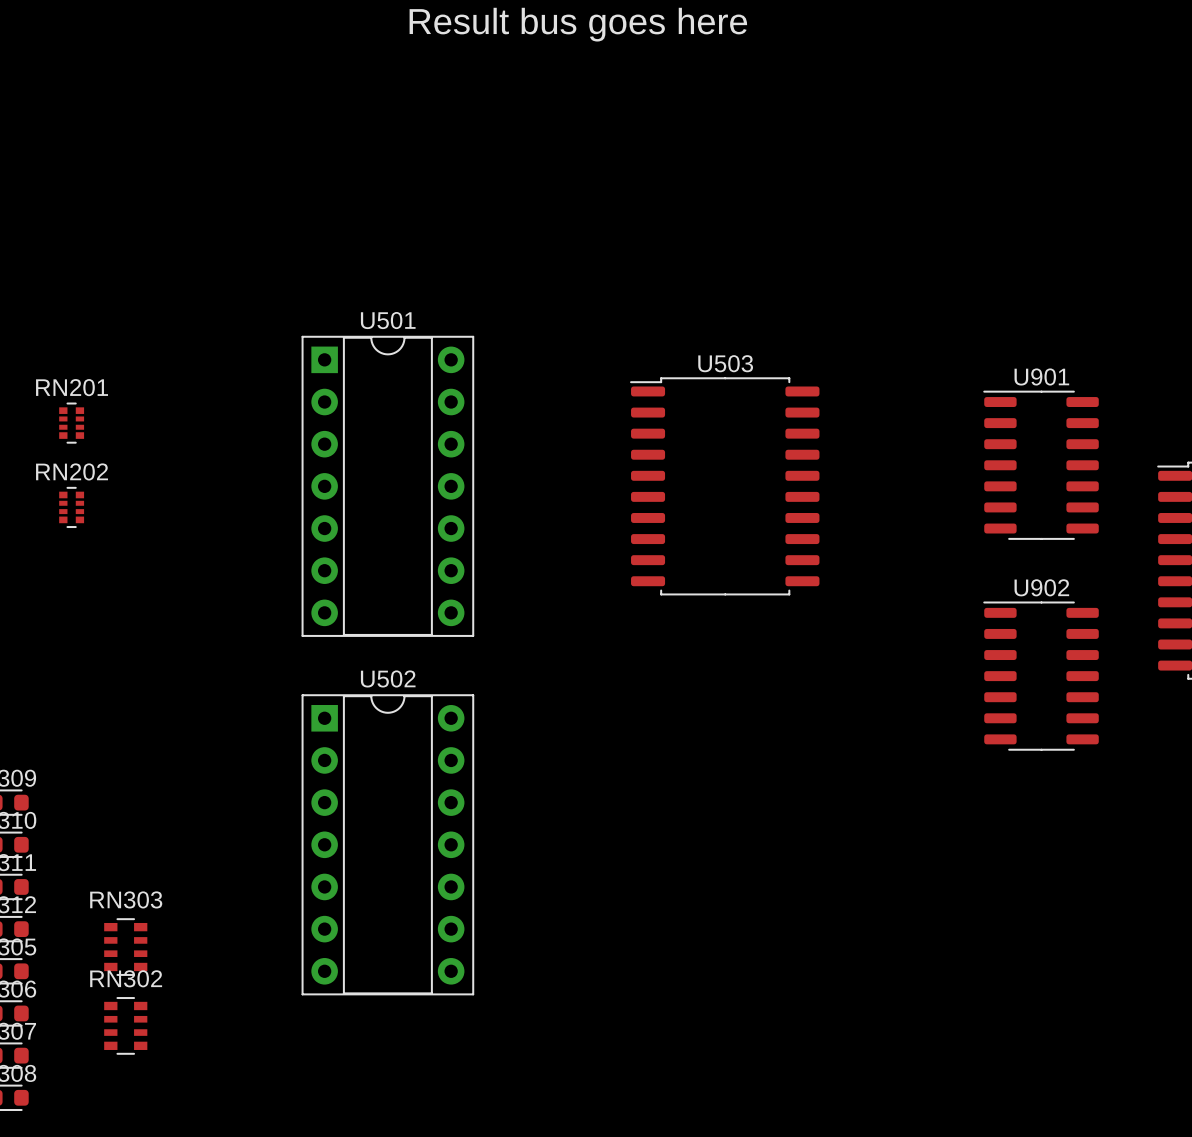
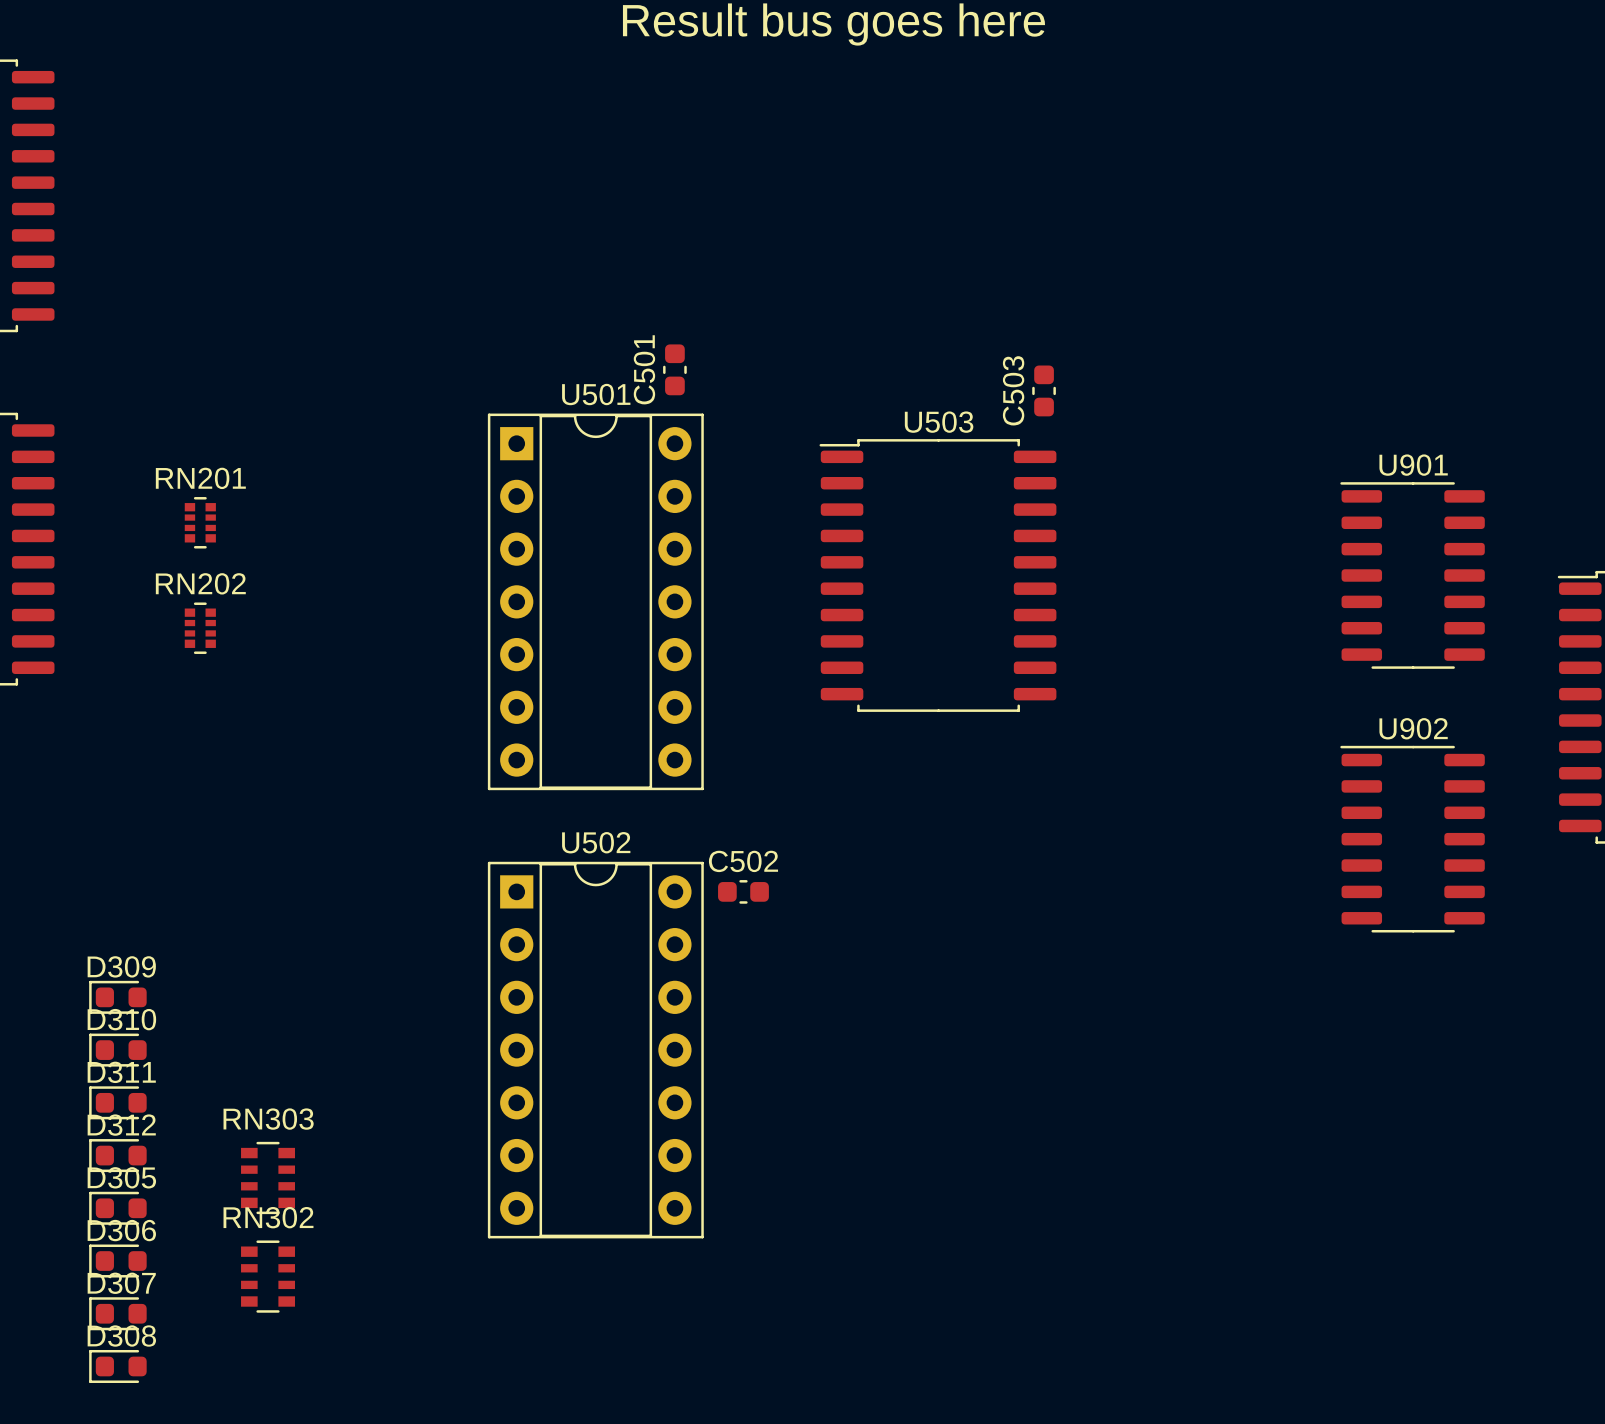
C501: none -> (674, 369)
C503: none -> (1044, 390)
U503 position: (724, 486) -> (937, 575)
C502: none -> (743, 891)

